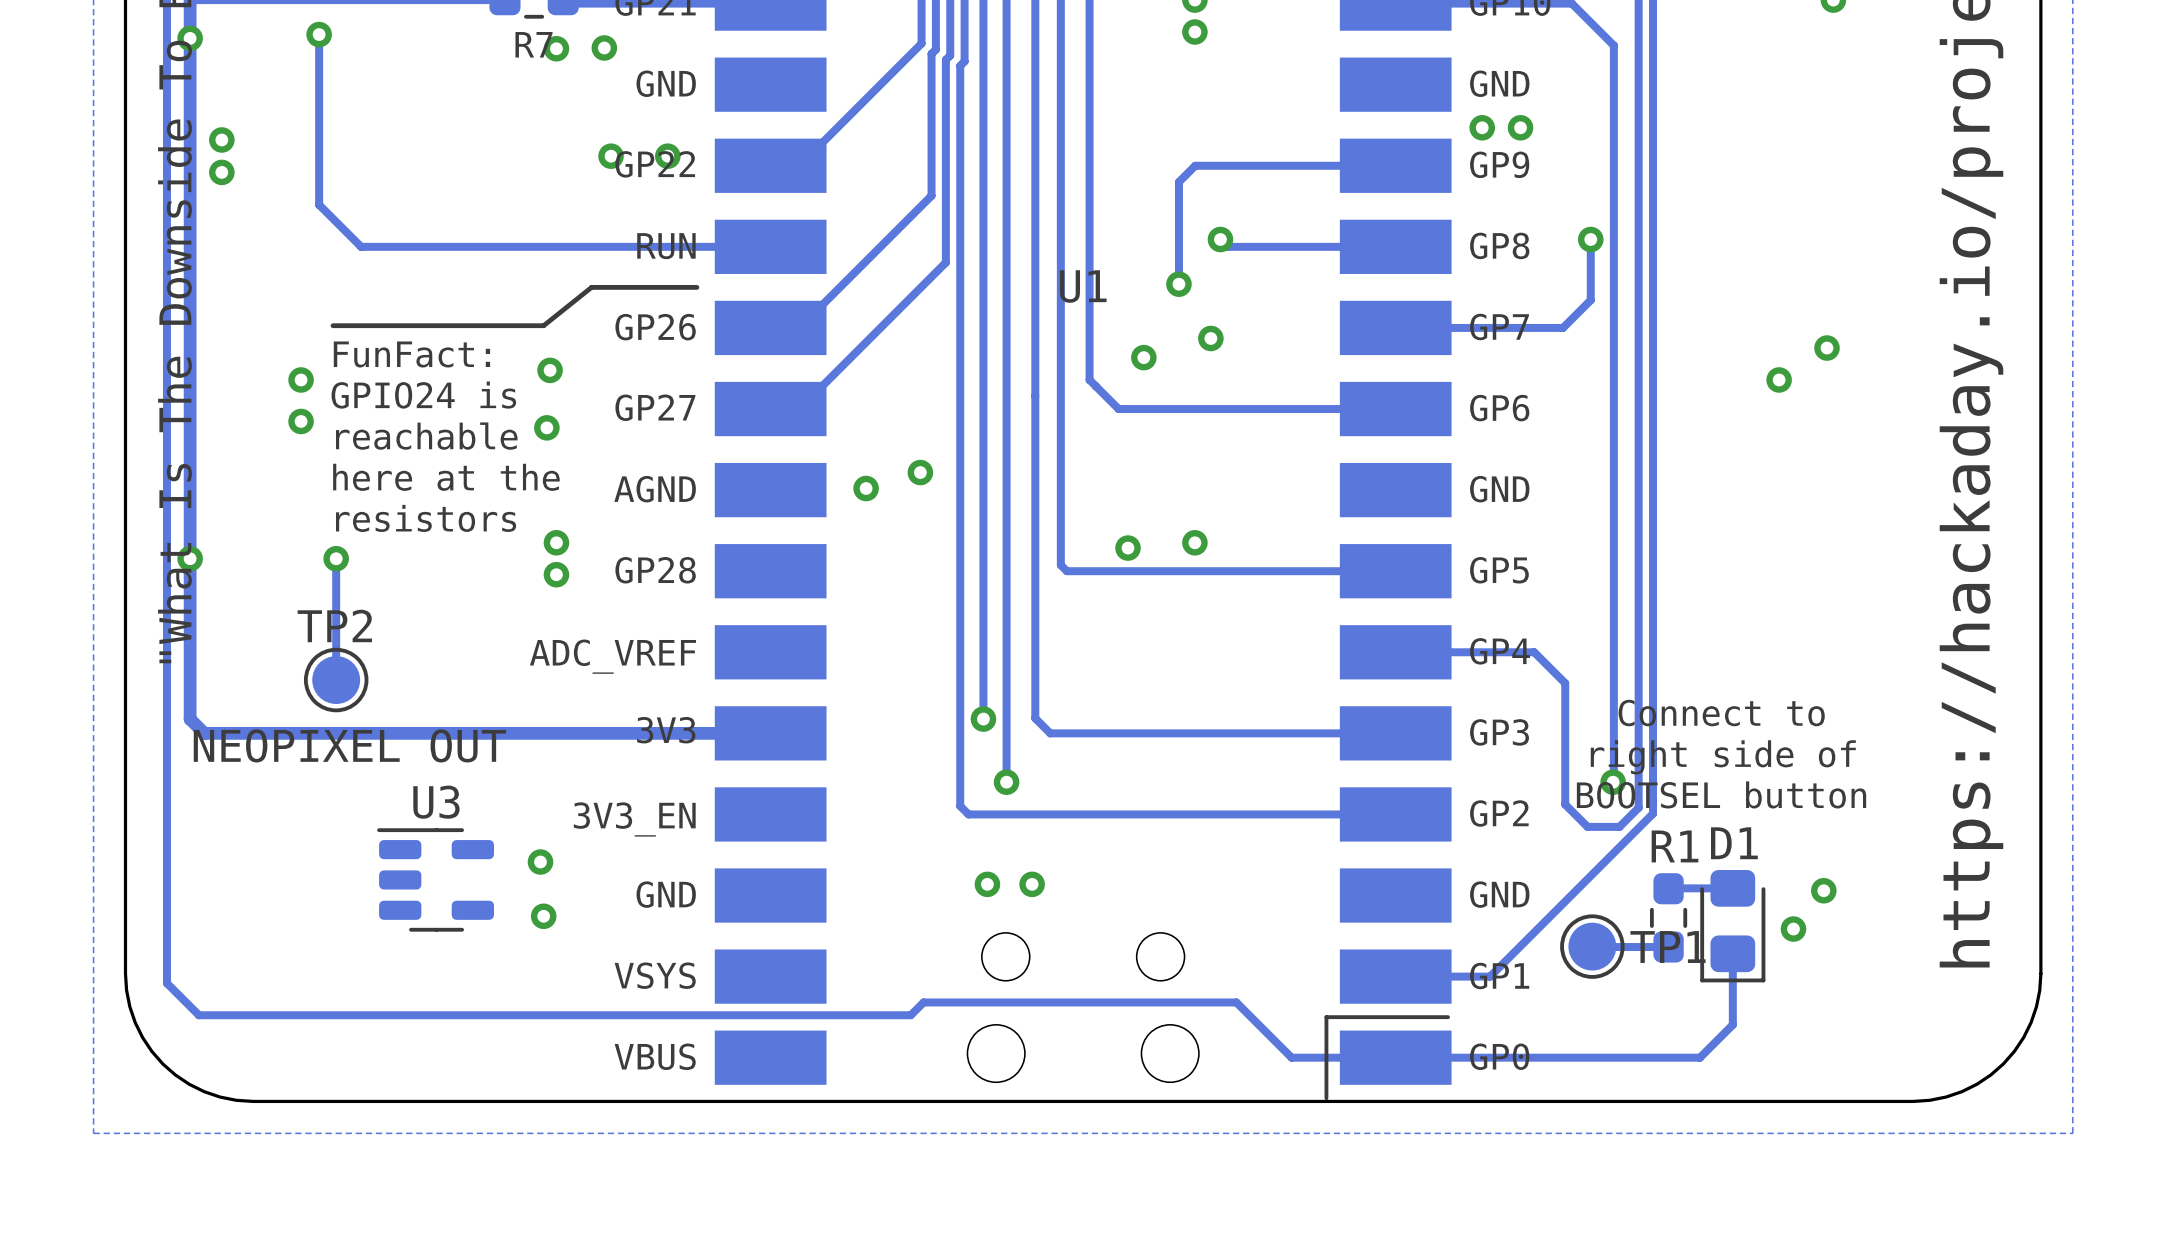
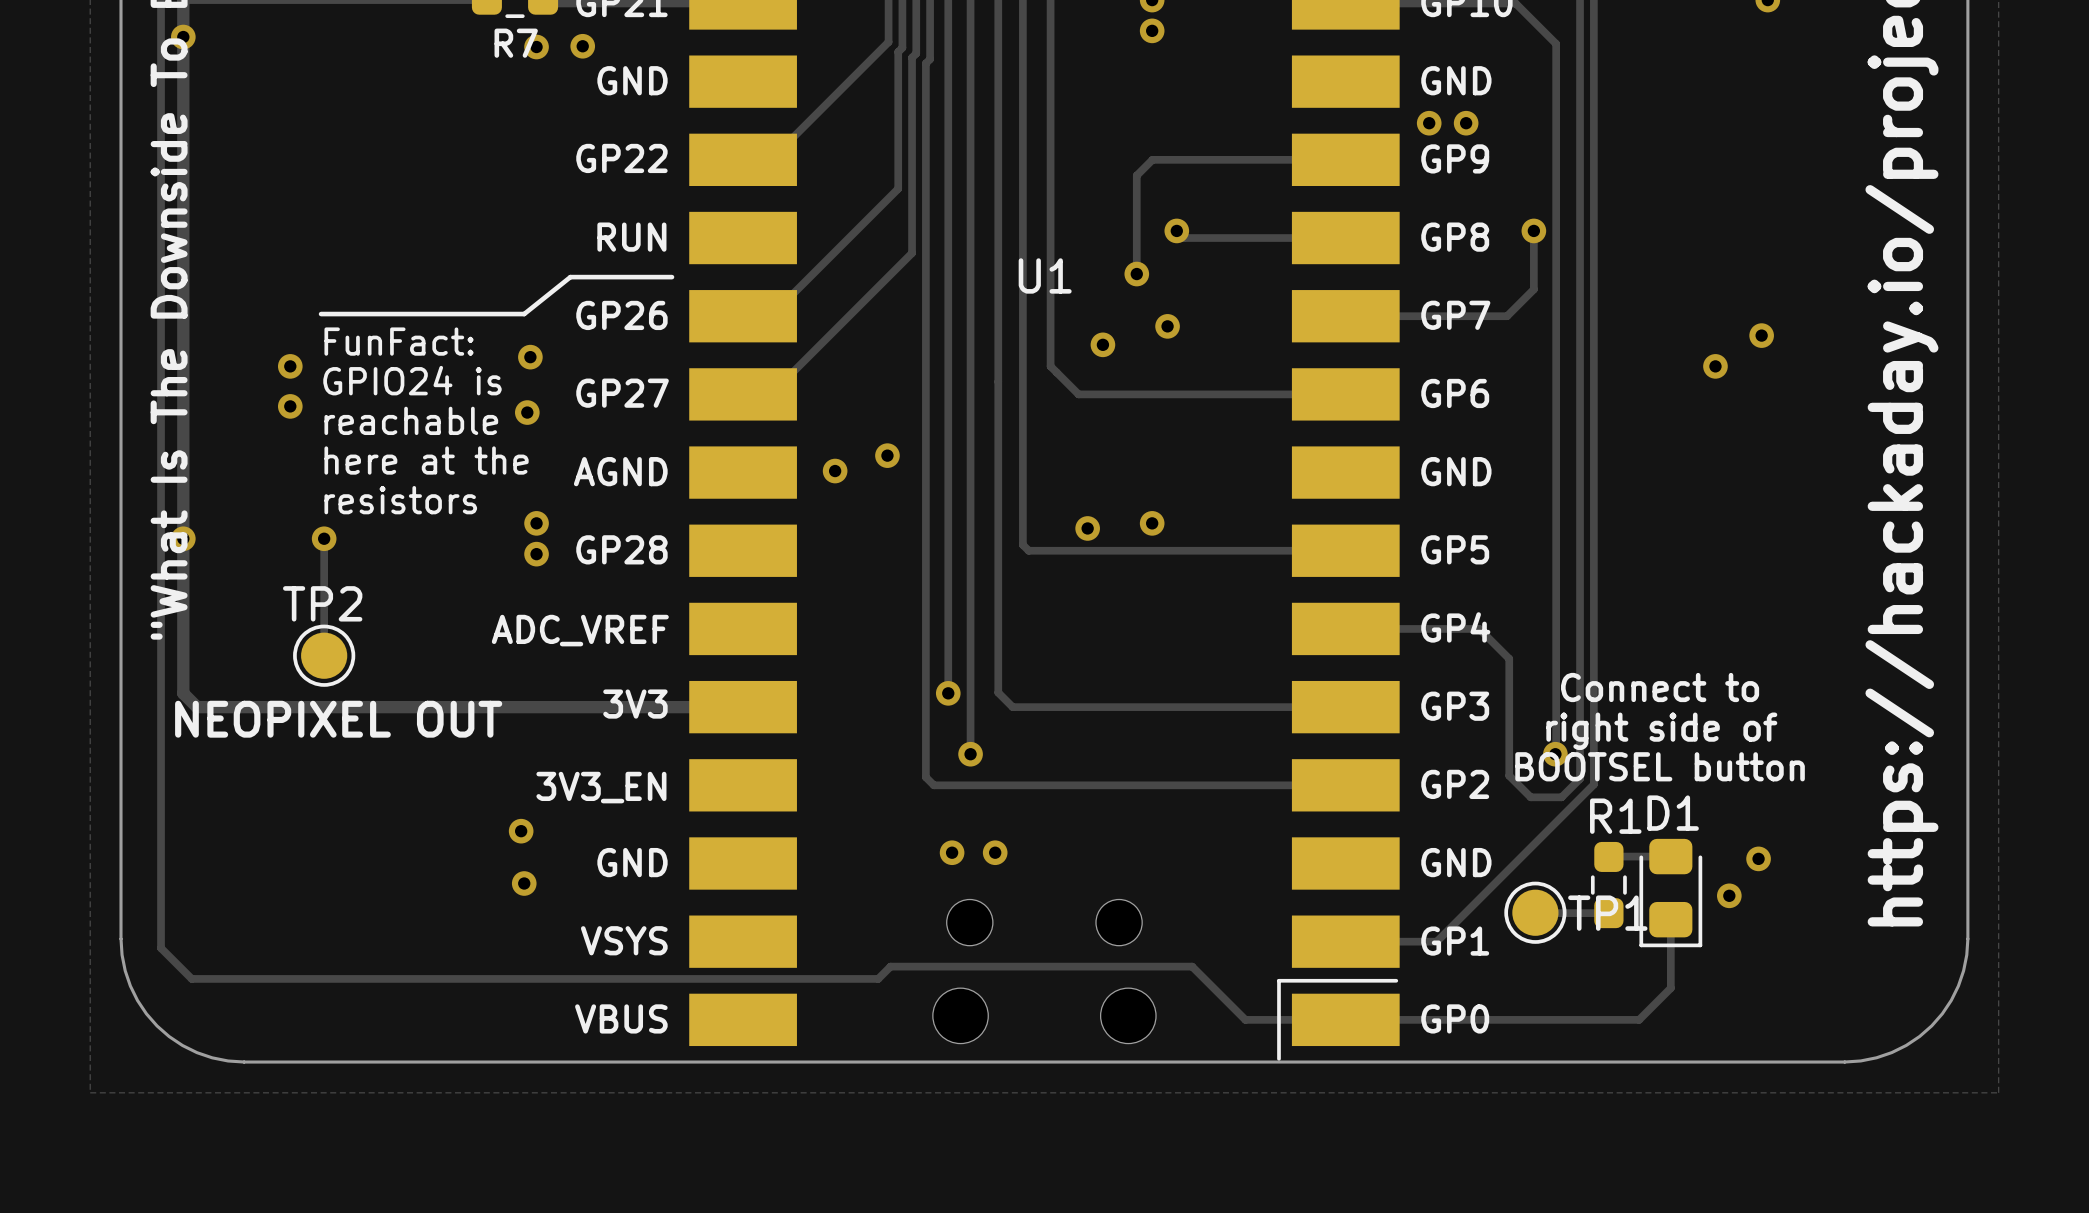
track: (319, 34) (319, 204) (361, 246) (799, 246) -> none
via: (319, 34) -> none
via: (221, 139) -> none
via: (611, 156) -> none
via: (667, 156) -> none
via: (221, 172) -> none
U3: (435, 879) -> none

